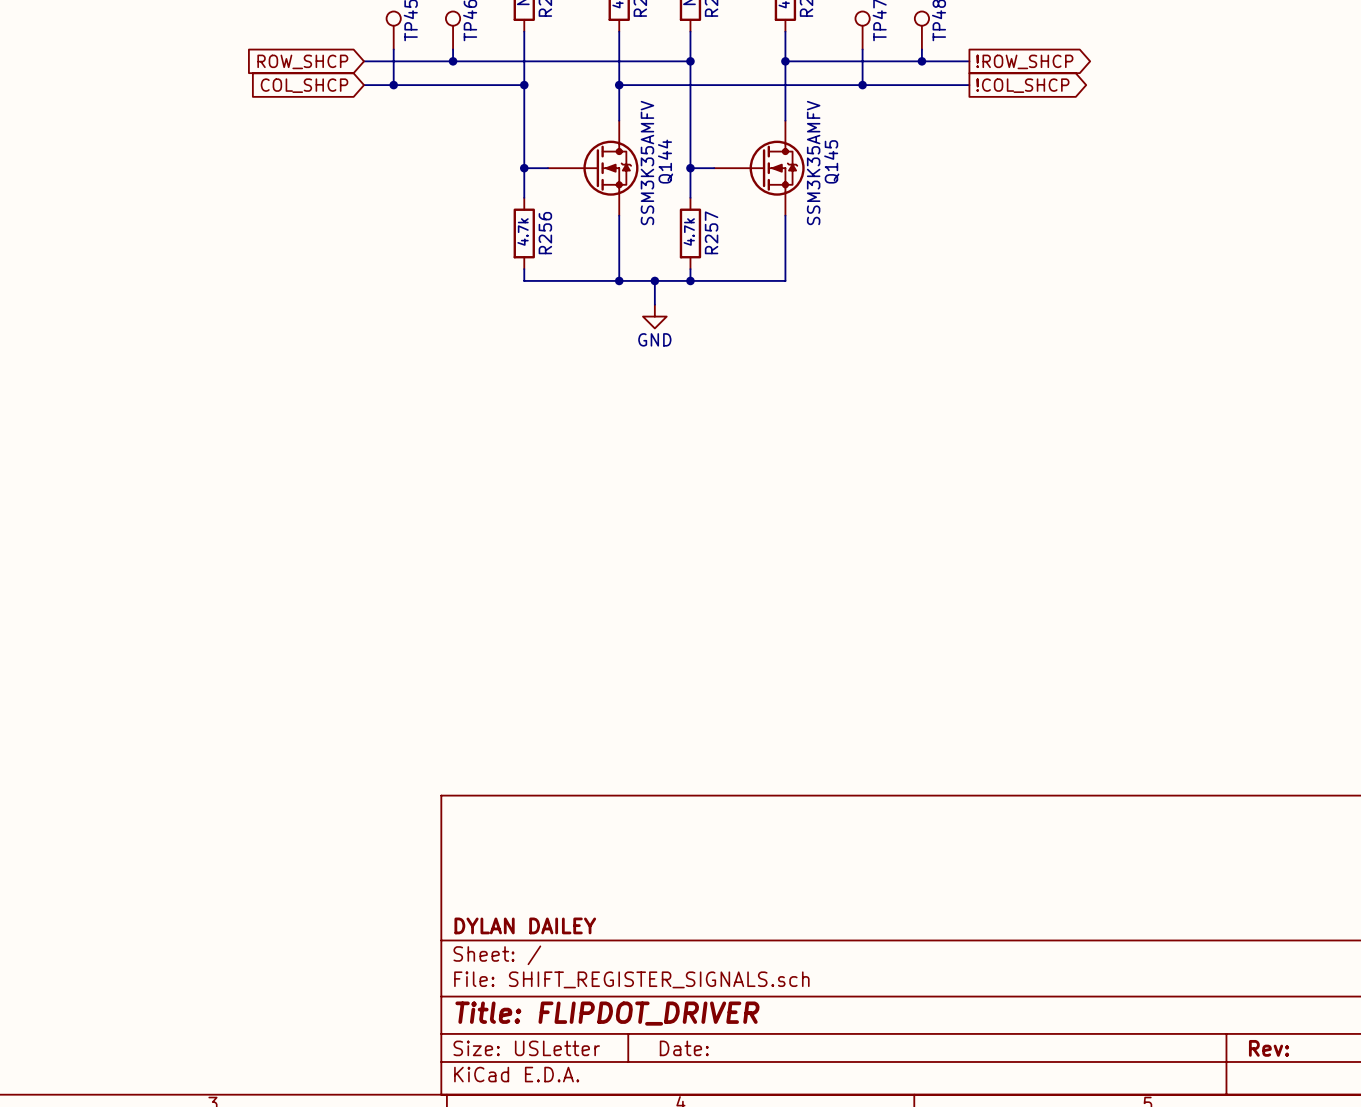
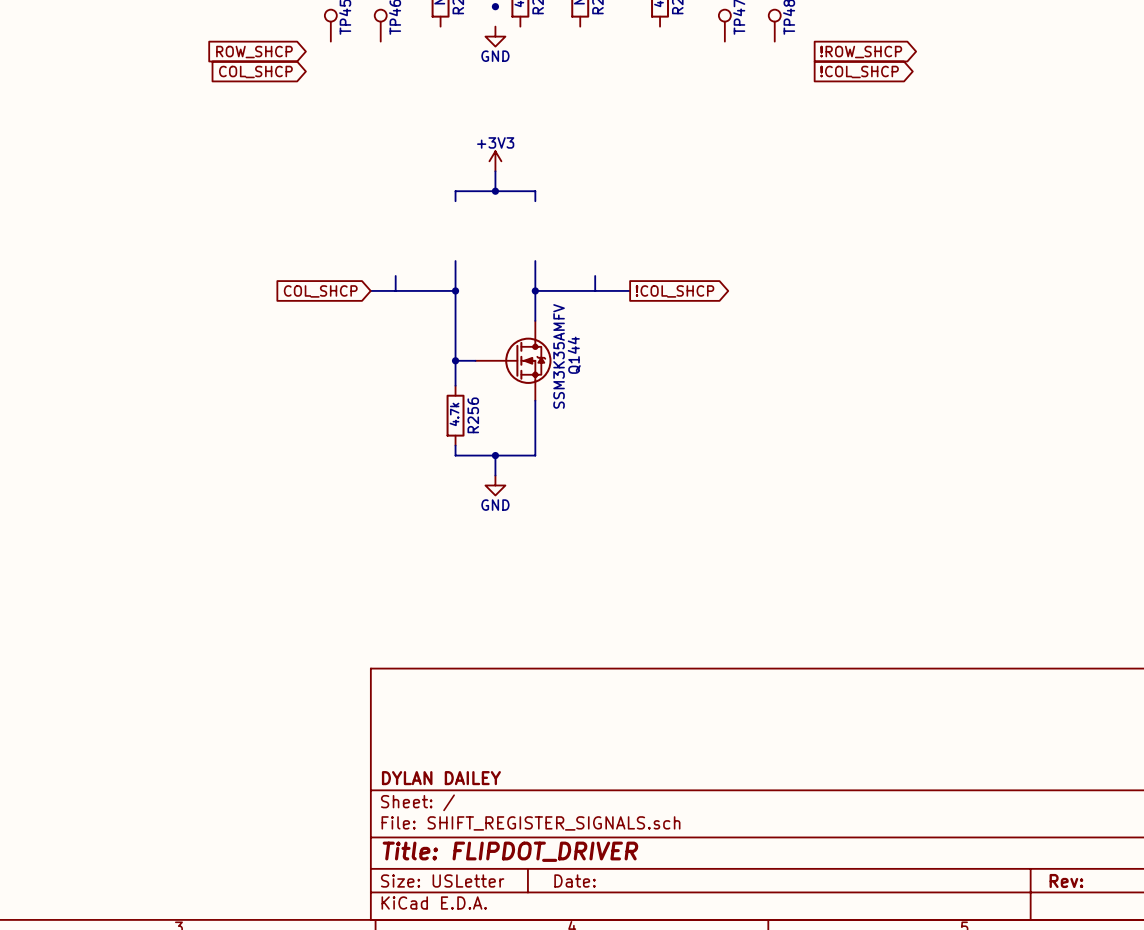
junction: none -> (495, 6)
wire: (524, 31) (524, 197) -> none
wire: (619, 31) (619, 120) -> none
wire: (690, 31) (690, 197) -> none
wire: (785, 31) (785, 120) -> none
power symbol: none -> GND (495, 36)
wire: (393, 49) (393, 85) -> none
wire: (453, 49) (453, 61) -> none
wire: (862, 49) (862, 85) -> none
wire: (921, 49) (921, 61) -> none
wire: (364, 61) (690, 61) -> none
junction: (453, 61) -> none
junction: (690, 61) -> none
wire: (785, 61) (969, 61) -> none
junction: (785, 61) -> none
junction: (921, 61) -> none
wire: (364, 85) (524, 85) -> none
junction: (393, 85) -> none
junction: (524, 85) -> none
wire: (619, 85) (969, 85) -> none
junction: (619, 85) -> none
junction: (862, 85) -> none
wire: (524, 168) (548, 168) -> none
junction: (524, 168) -> none
Q144 position: (593, 168) -> (513, 360)
wire: (690, 168) (714, 168) -> none
junction: (690, 168) -> none
Q145: SSM3K35AMFV (759, 168) -> none
power symbol: none -> +3V3 (495, 161)
wire: (619, 215) (619, 280) -> none
wire: (785, 215) (785, 280) (524, 280) (524, 269) -> none
junction: none -> (495, 191)
R256 position: (524, 233) -> (455, 415)
R257: (690, 233) -> none
wire: none -> (455, 201) (455, 191) (535, 191) (535, 201)
wire: (690, 269) (690, 280) -> none
junction: (619, 280) -> none
wire: (654, 280) (654, 304) -> (495, 171) (495, 191)
junction: (654, 280) -> none
junction: (690, 280) -> none
wire: none -> (455, 261) (455, 385)
wire: none -> (535, 261) (535, 320)
power symbol: GND (654, 316) -> none
wire: none -> (395, 276) (395, 290)
wire: none -> (595, 276) (595, 290)
global label: none -> COL_SHCP (320, 291)
wire: none -> (370, 290) (455, 290)
junction: none -> (455, 290)
wire: none -> (535, 290) (630, 290)
junction: none -> (535, 290)
global label: none -> !COL_SHCP (675, 291)
wire: none -> (455, 360) (475, 360)
junction: none -> (455, 360)
wire: none -> (535, 400) (535, 455) (455, 455) (455, 445)
wire: none -> (495, 455) (495, 475)
junction: none -> (495, 455)
power symbol: none -> GND (495, 485)

